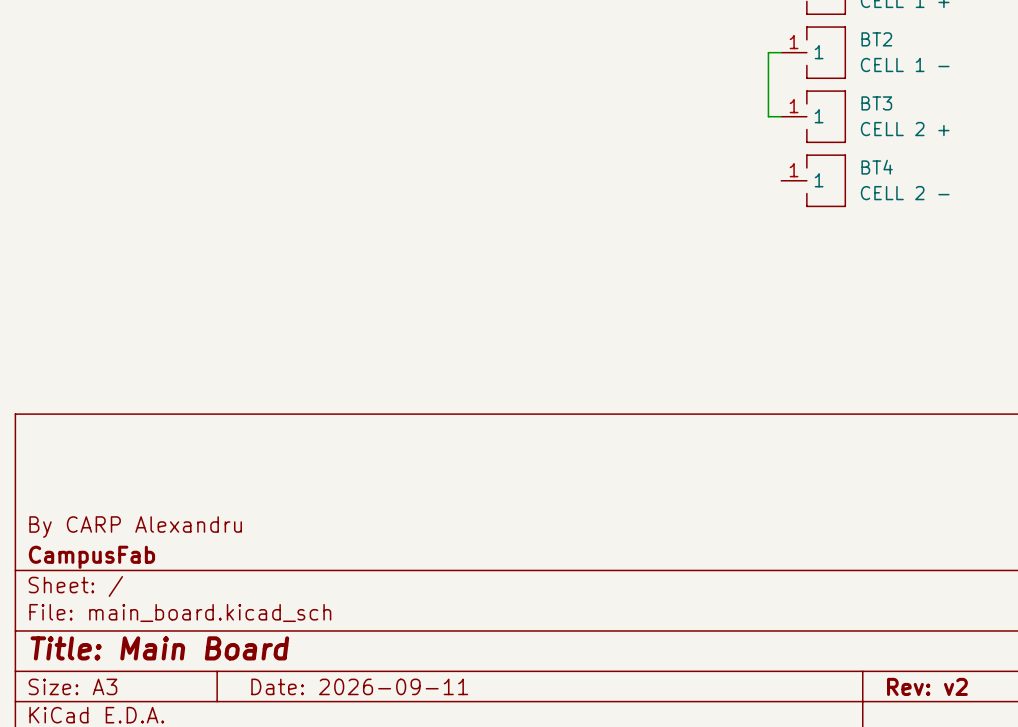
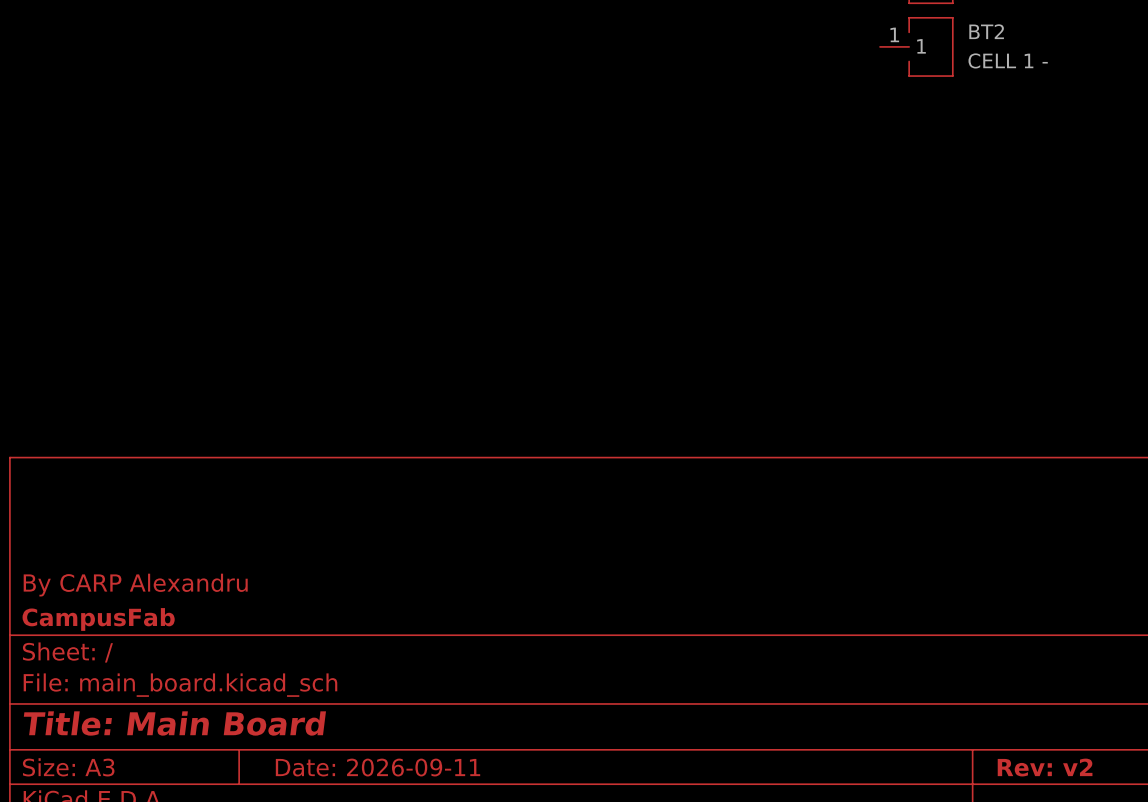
wire: (781, 52) (768, 52) (768, 116) (781, 116) -> none
BT3: CELL 2 + (813, 116) -> none
BT4: CELL 2 - (813, 180) -> none

